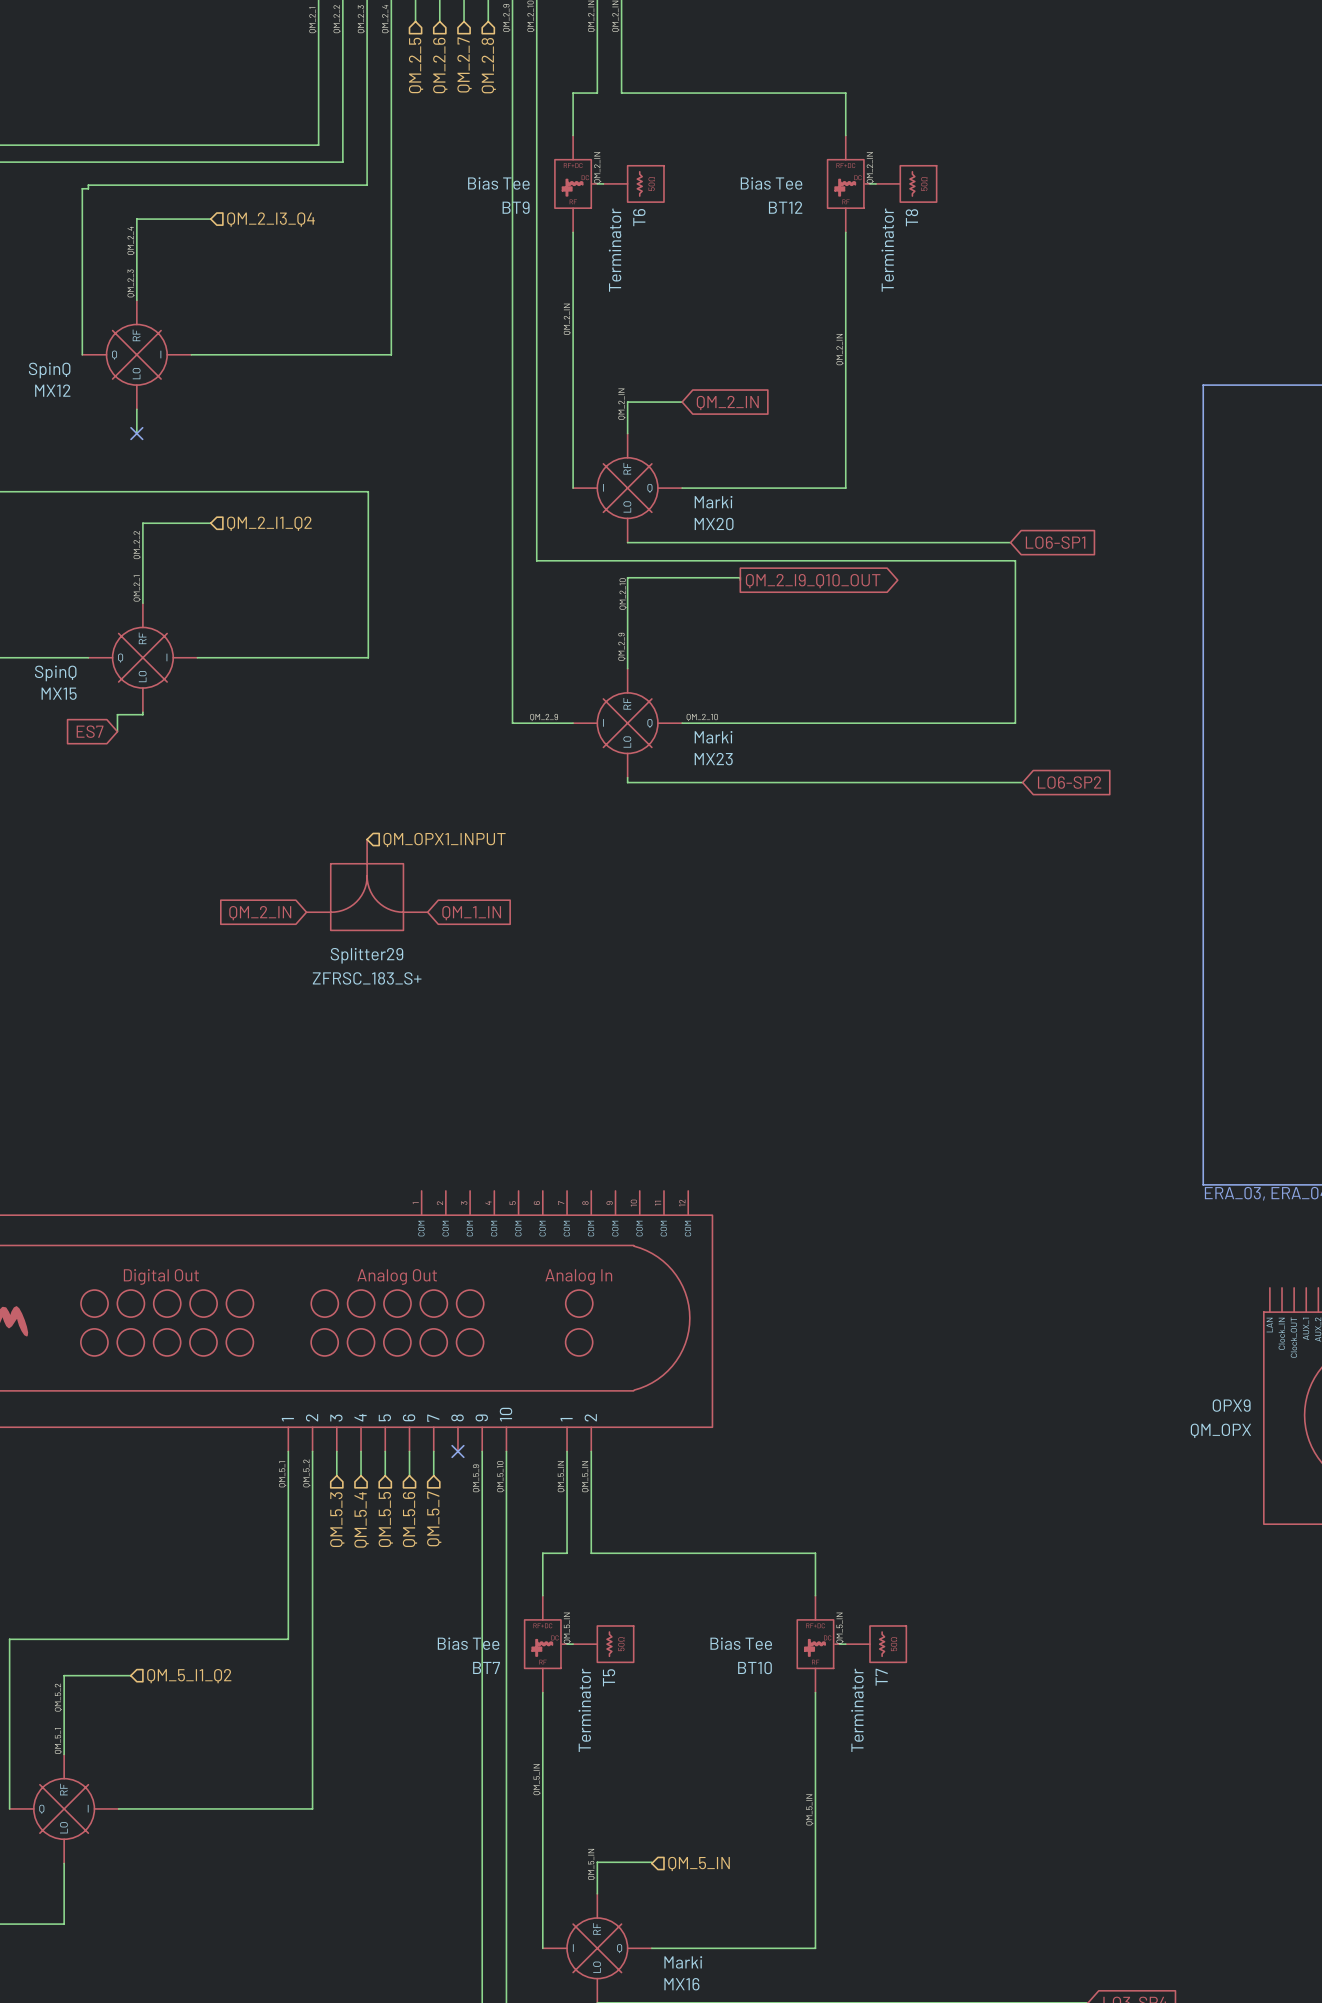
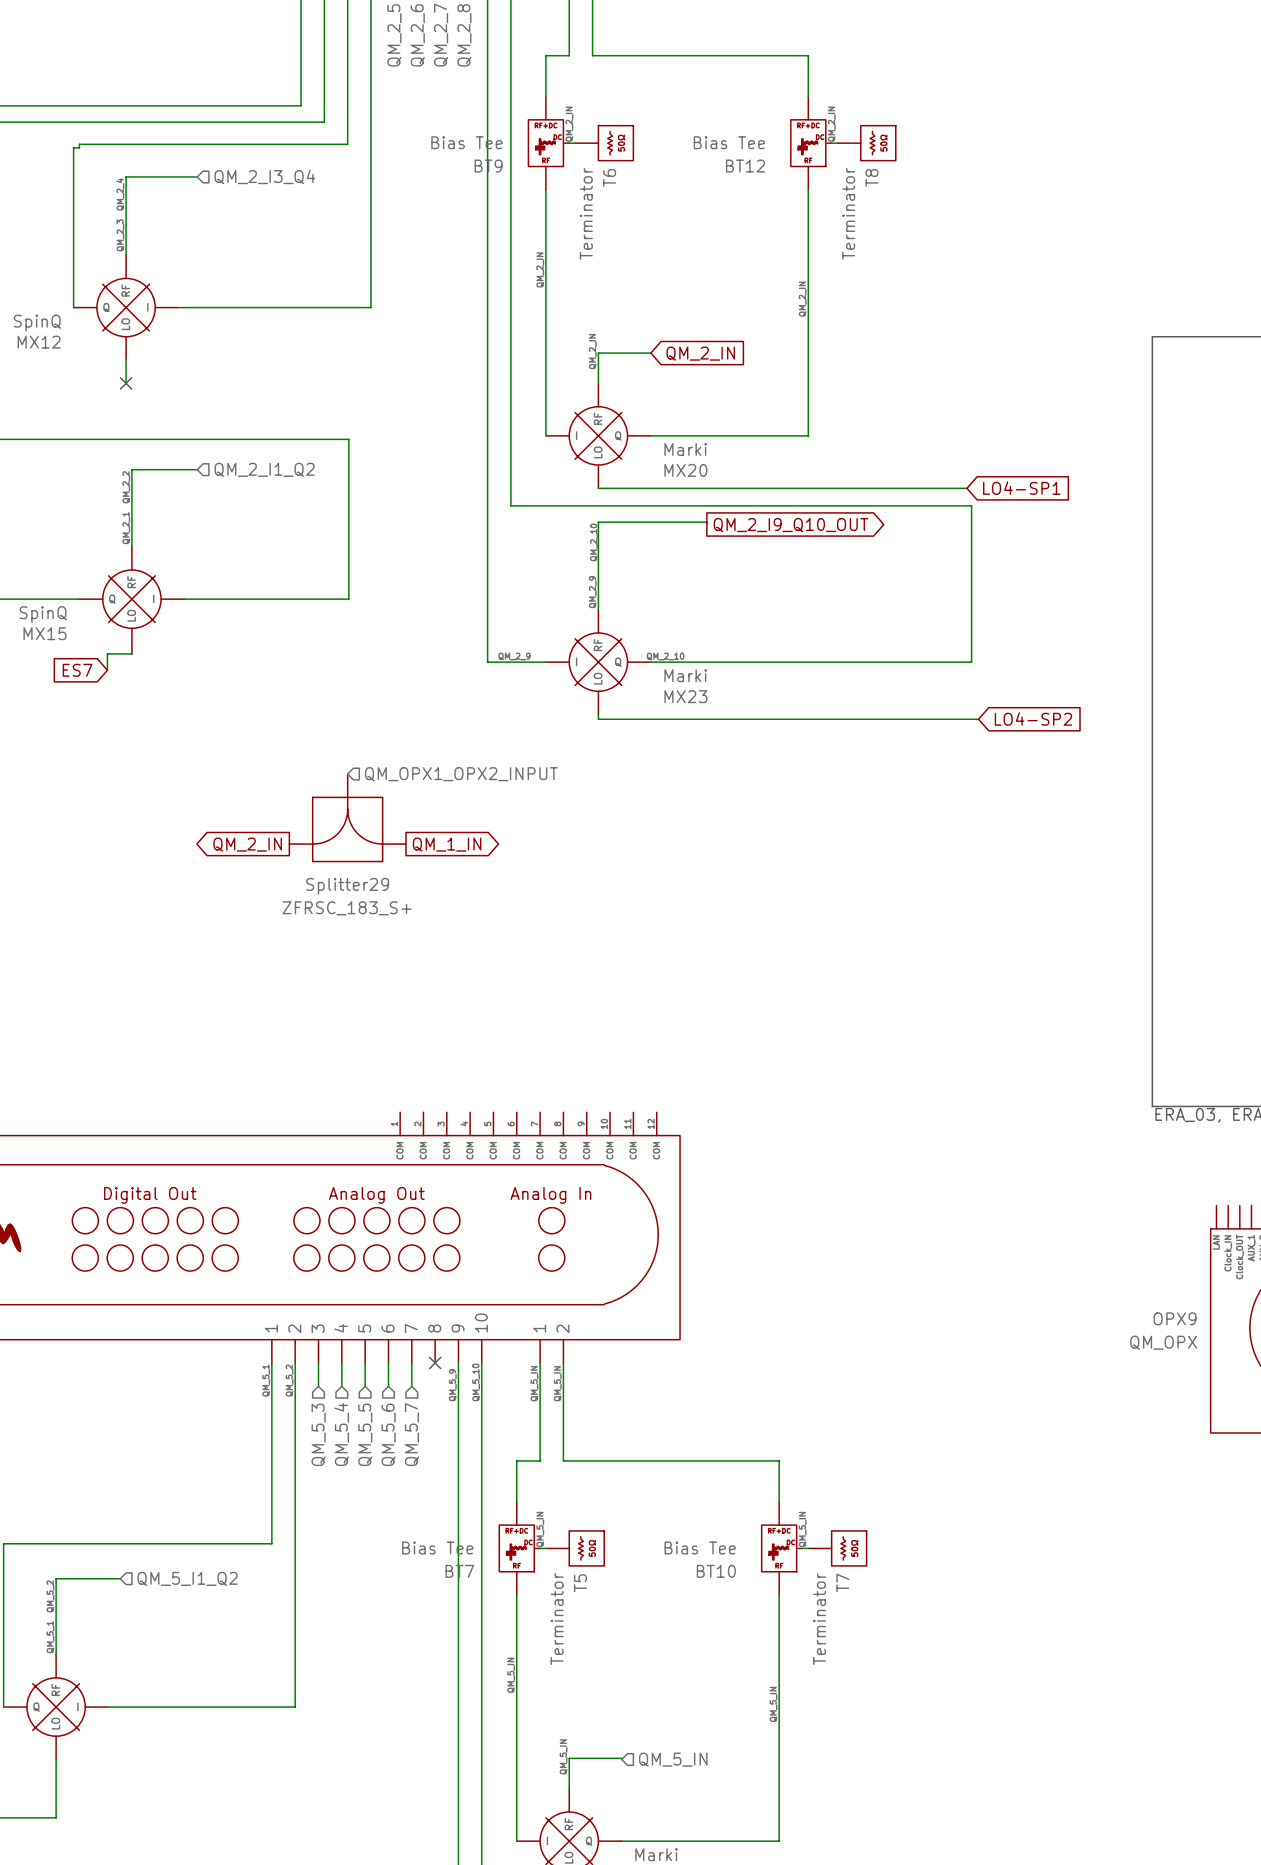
global label: LO6-SP1 (1055, 542) -> LO4-SP1 (1021, 488)
global label: LO6-SP2 (1069, 782) -> LO4-SP2 (1033, 718)
hierarchical label: QM_OPX1_INPUT (444, 839) -> QM_OPX1_OPX2_INPUT (461, 774)
global label shape: input (260, 913) -> output (247, 844)
global label shape: input (471, 913) -> output (447, 844)

